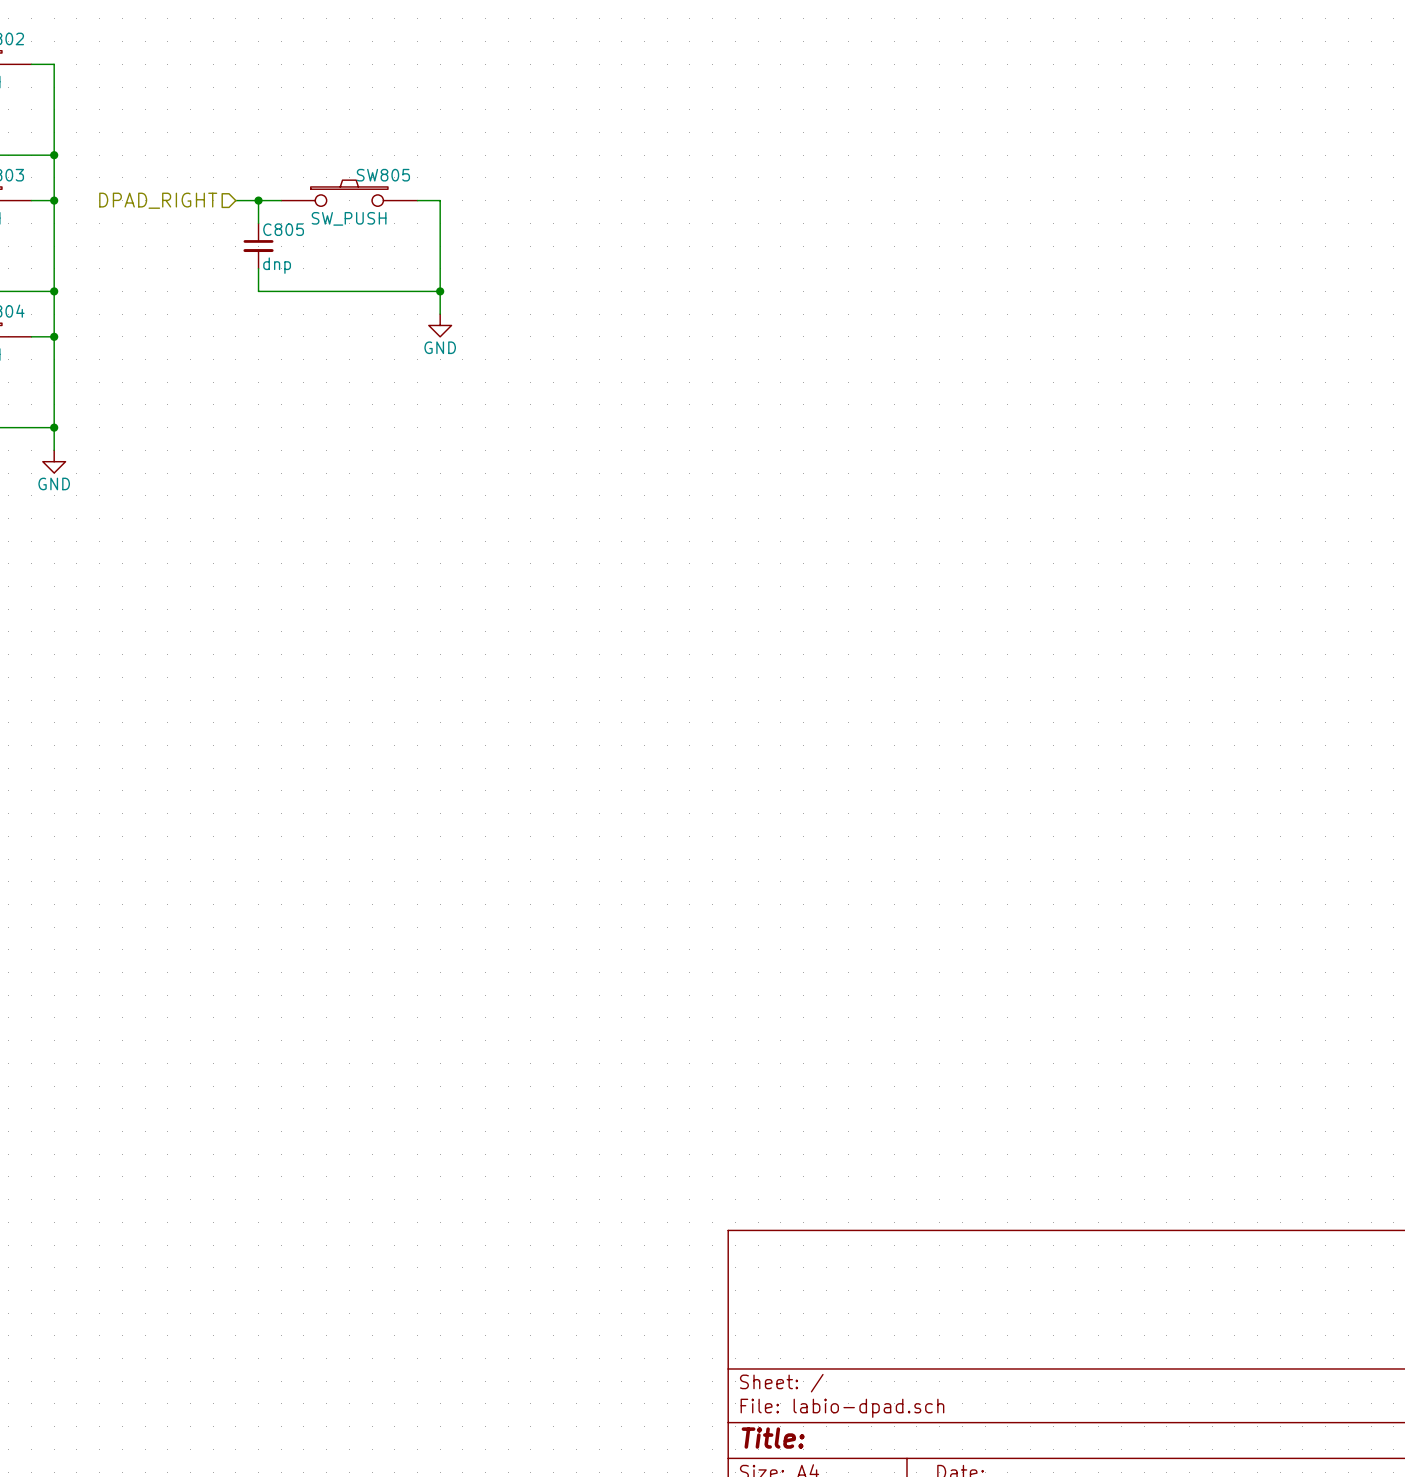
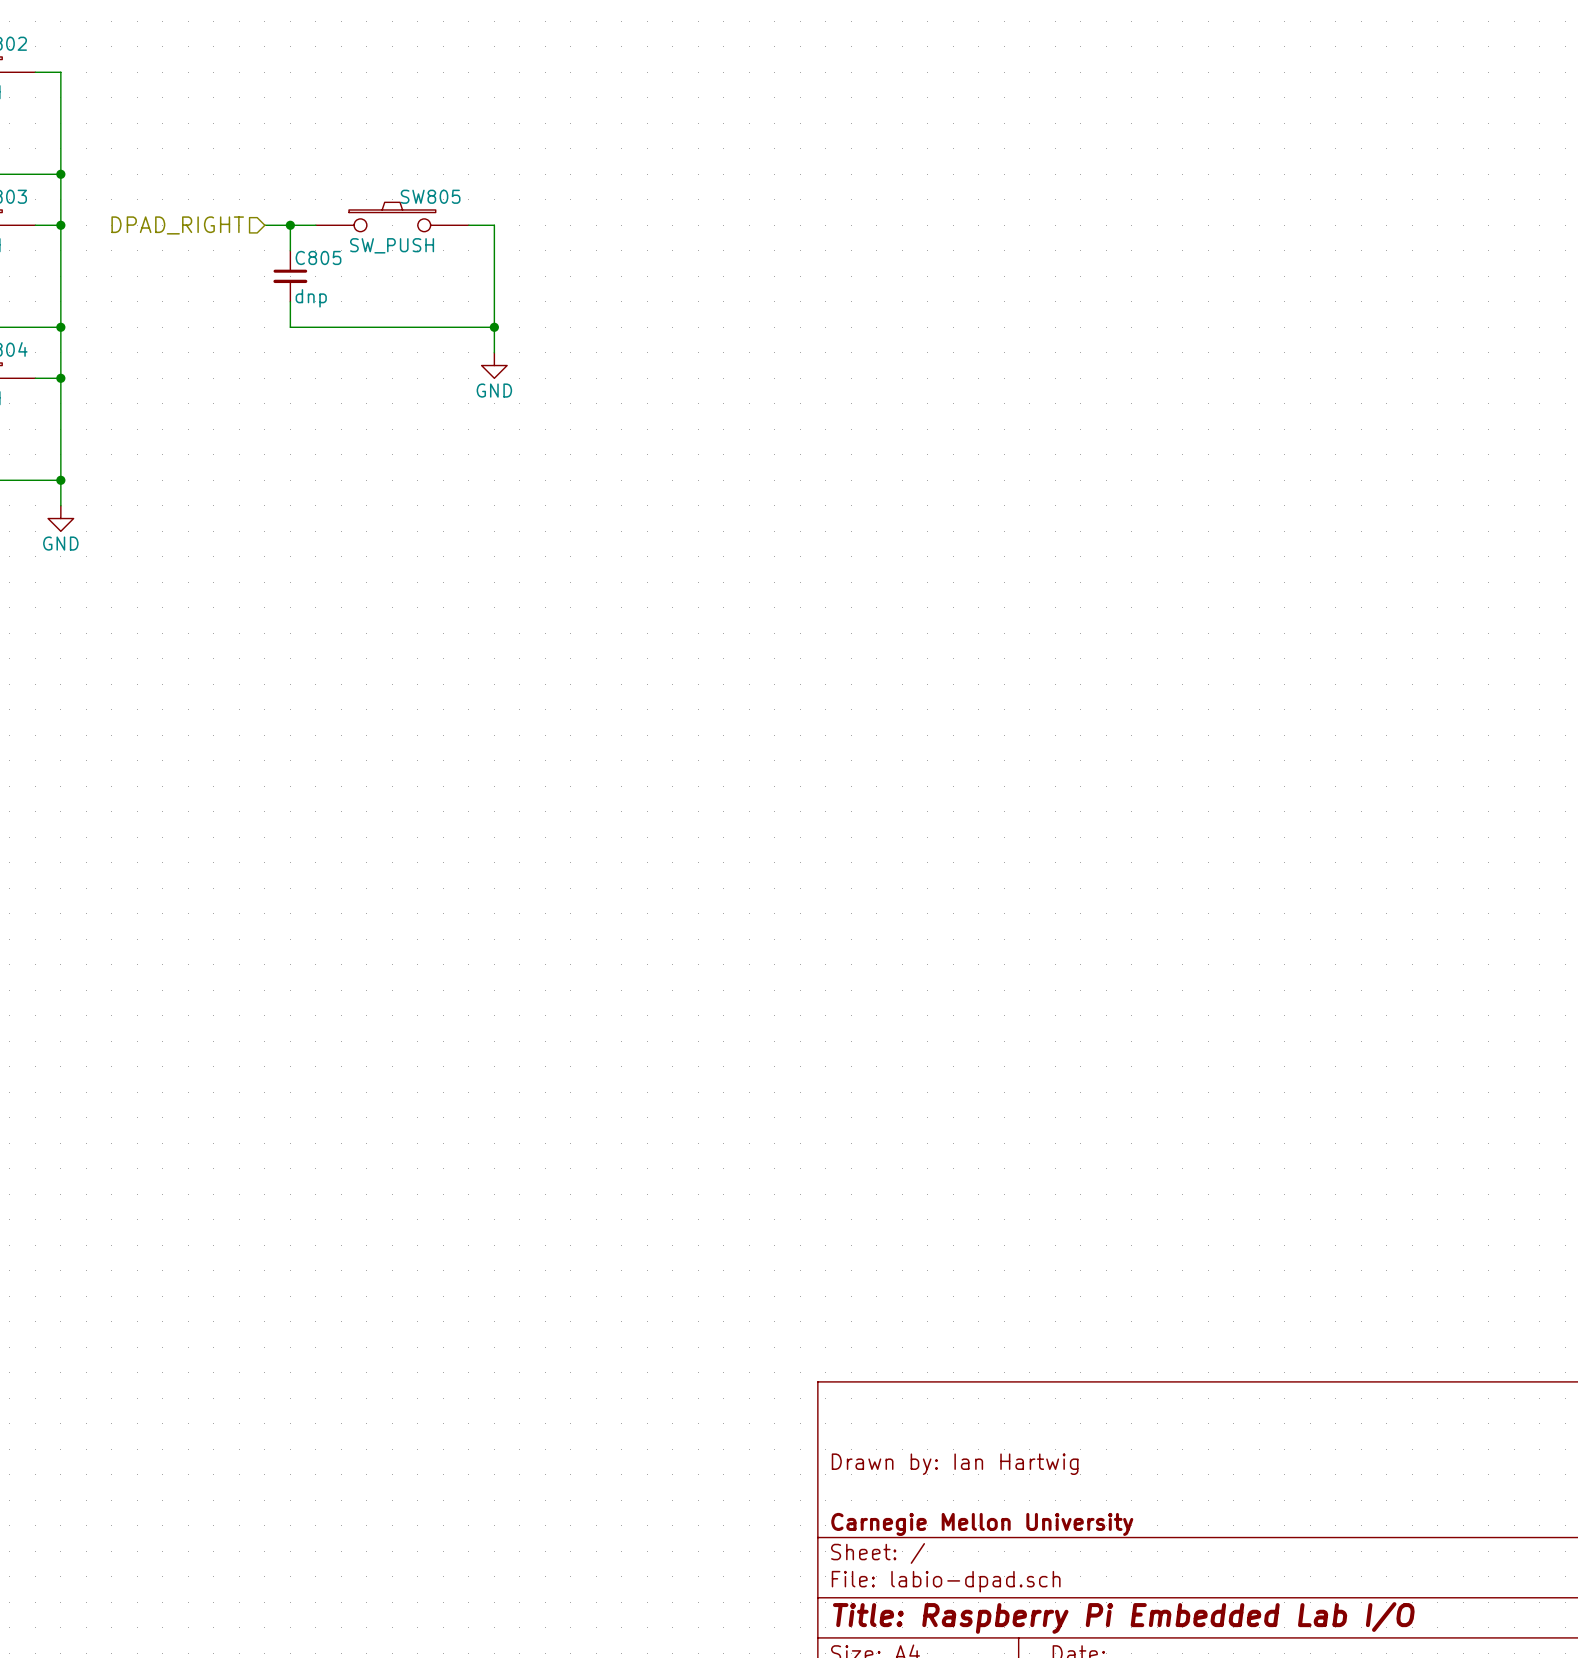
title block: none -> Drawn by: Ian Hartwig (955, 1464)
title block: none -> Carnegie Mellon University (982, 1524)
title block: Title: (773, 1438) -> Title: Raspberry Pi Embedded Lab I/O (1123, 1617)

